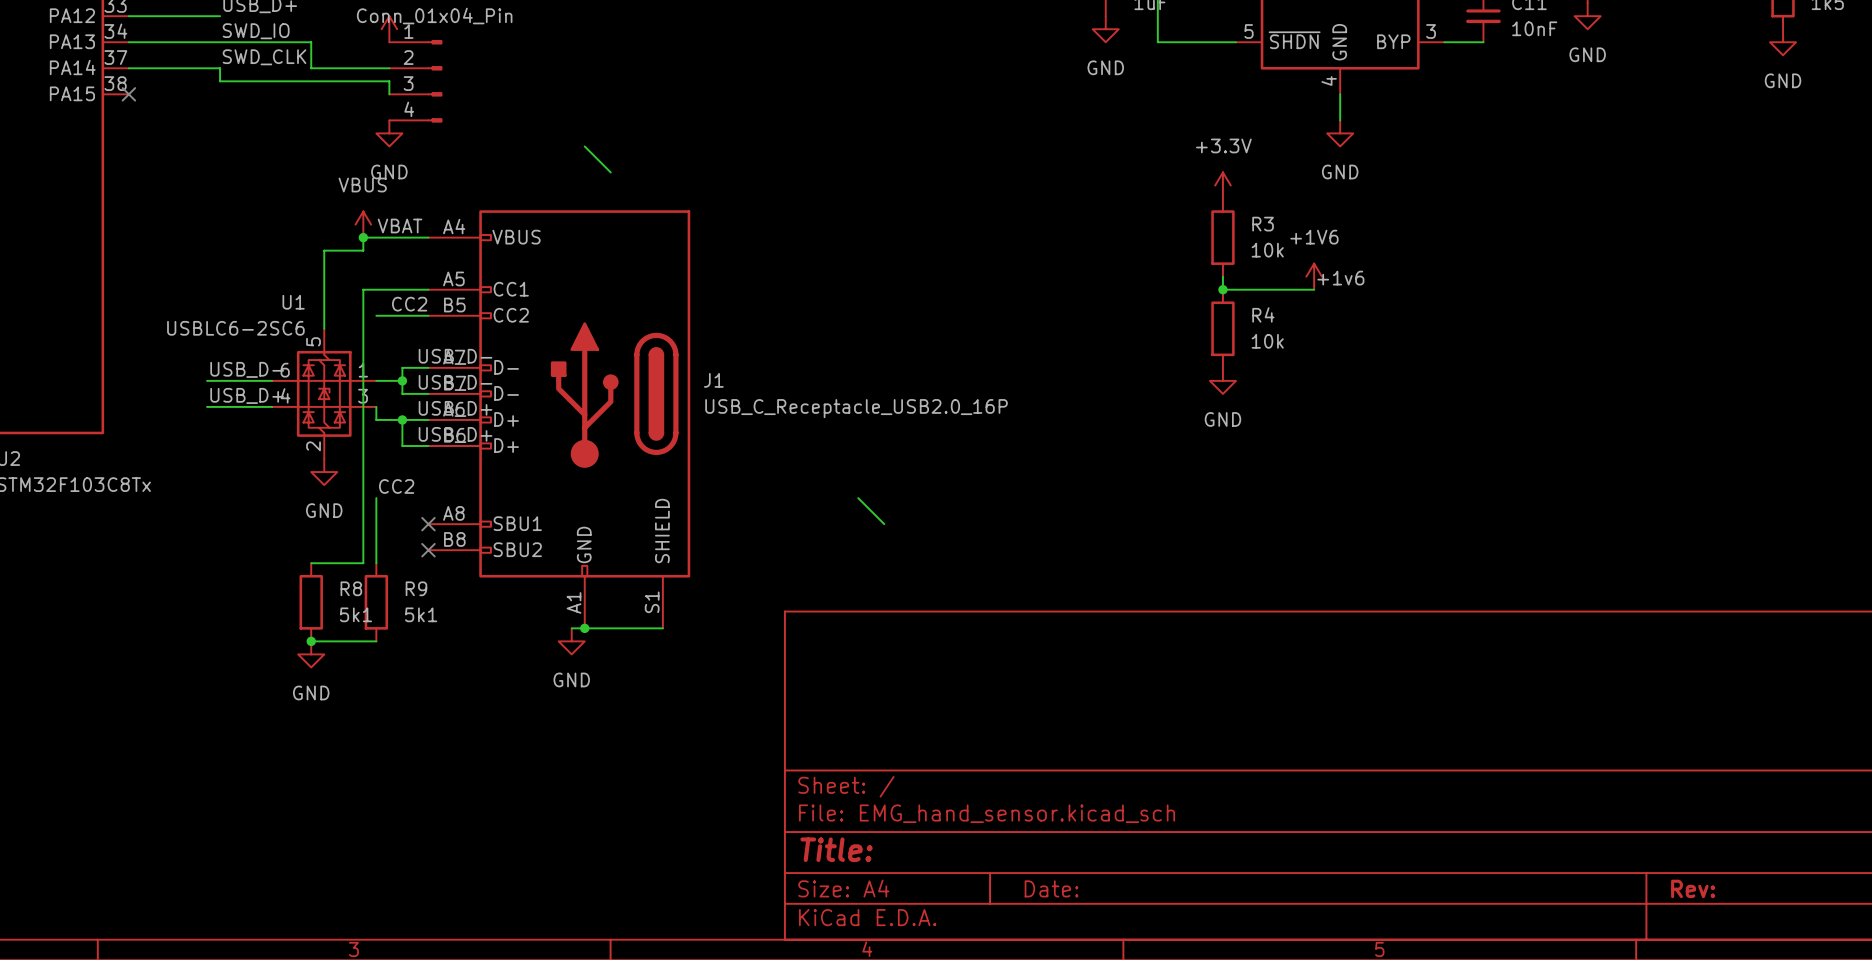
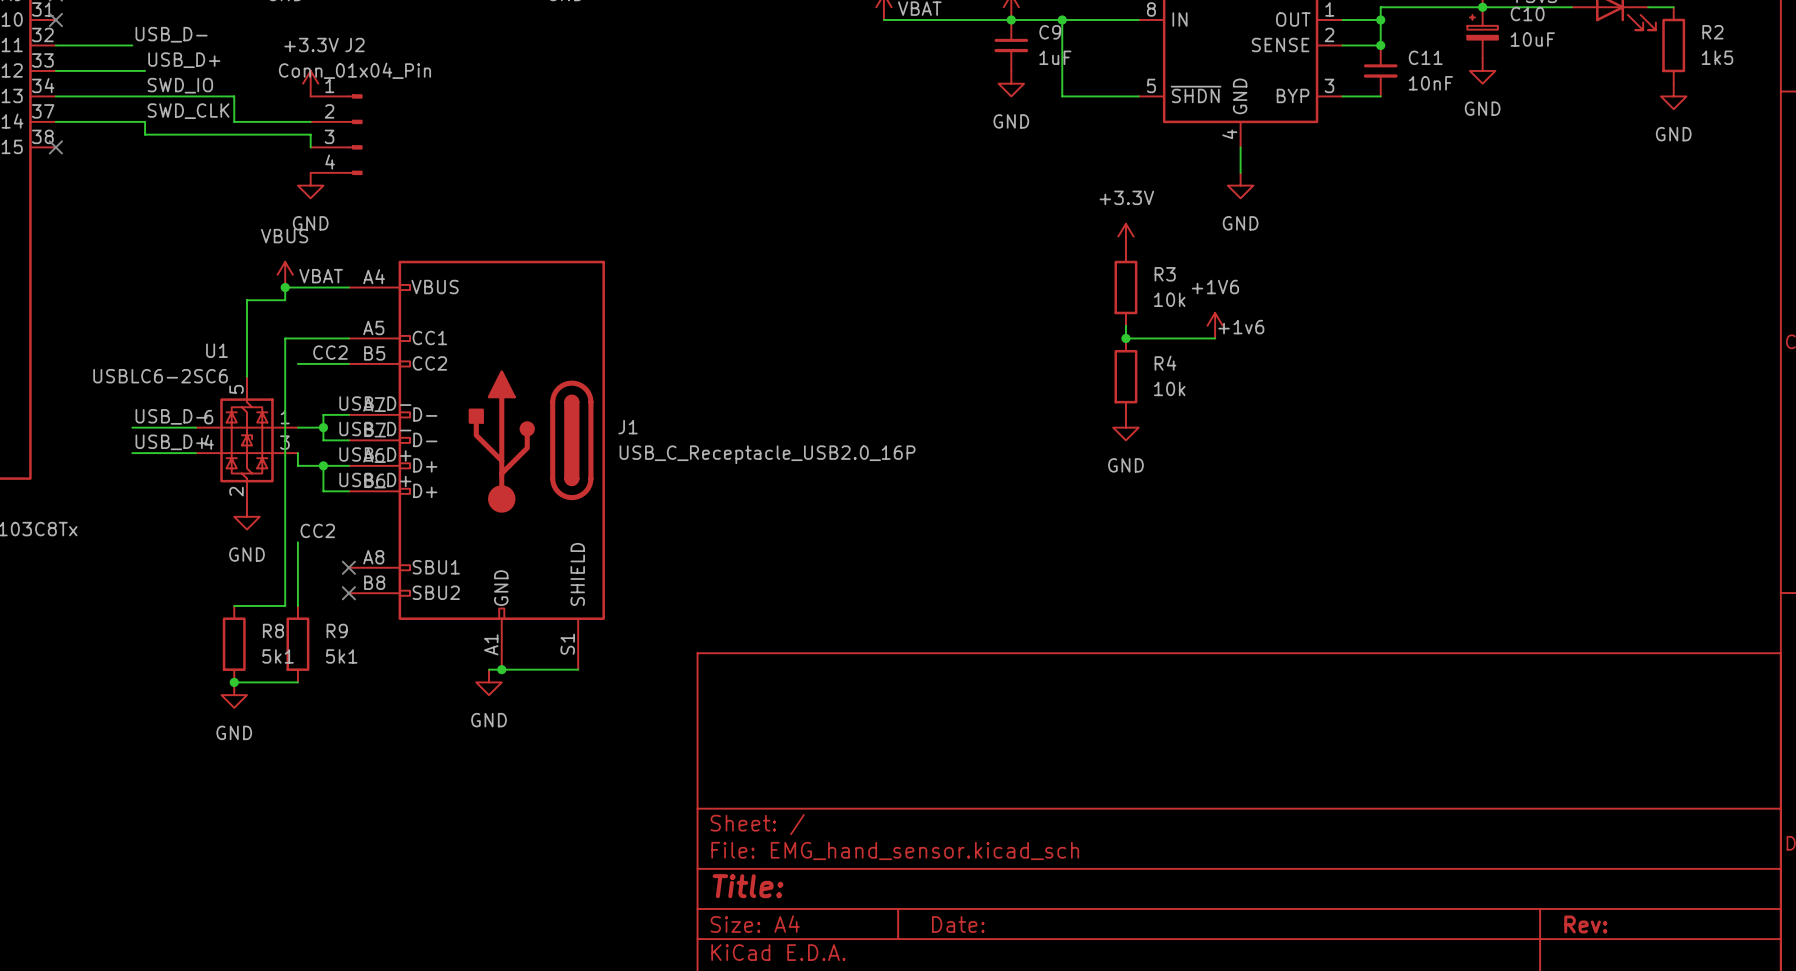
wire: (584, 146) (610, 172) -> none
wire: (858, 498) (884, 524) -> none

